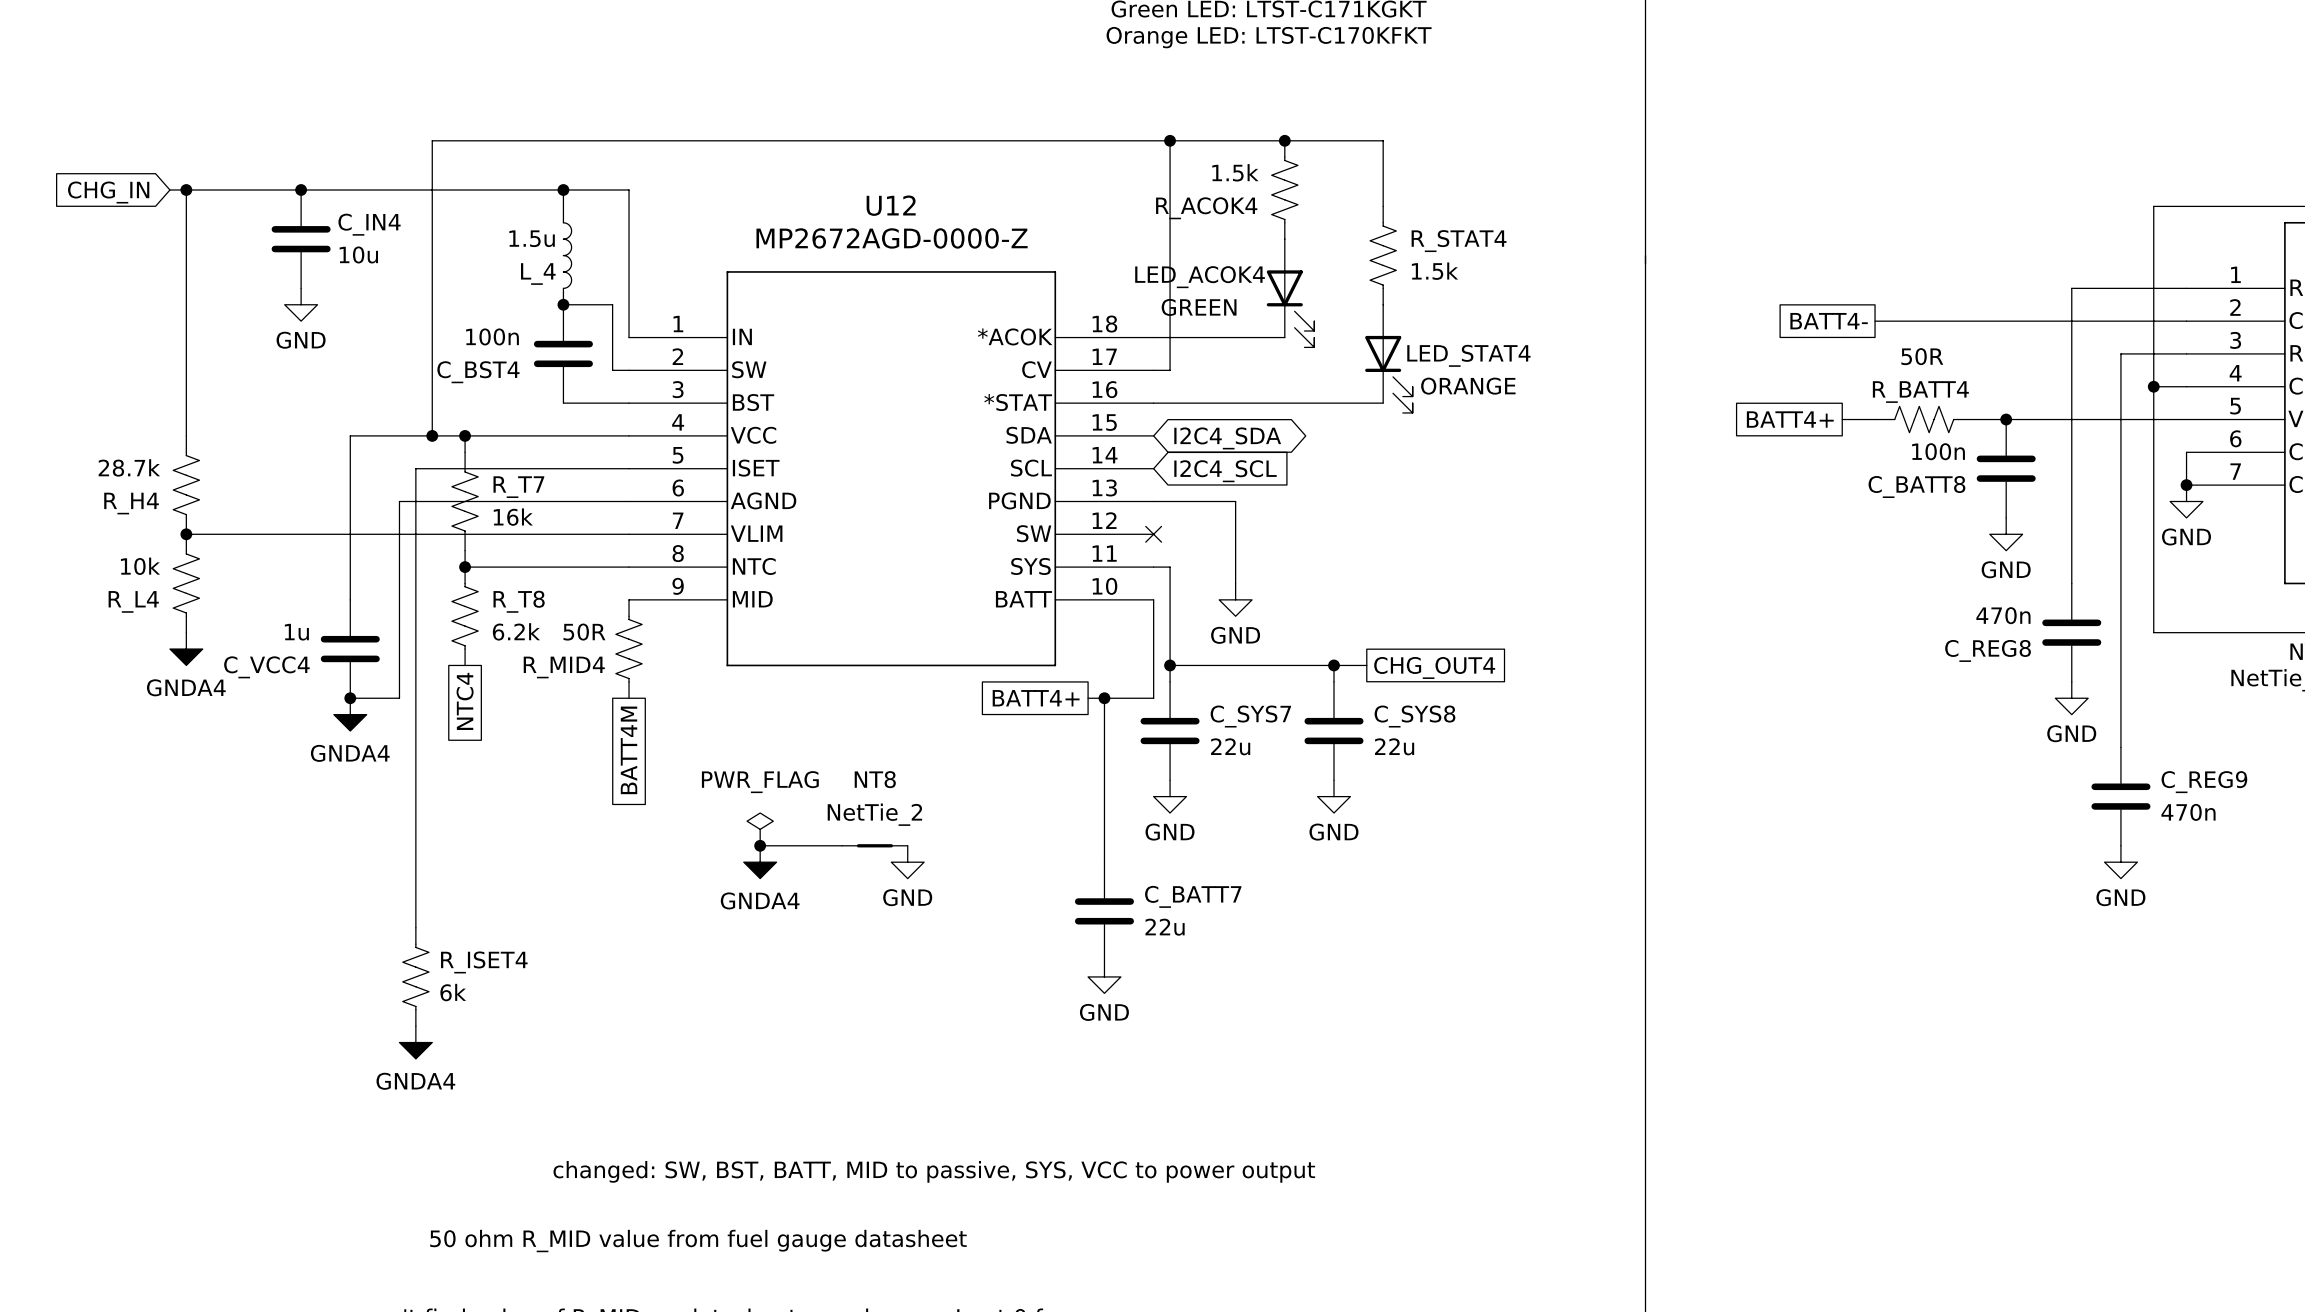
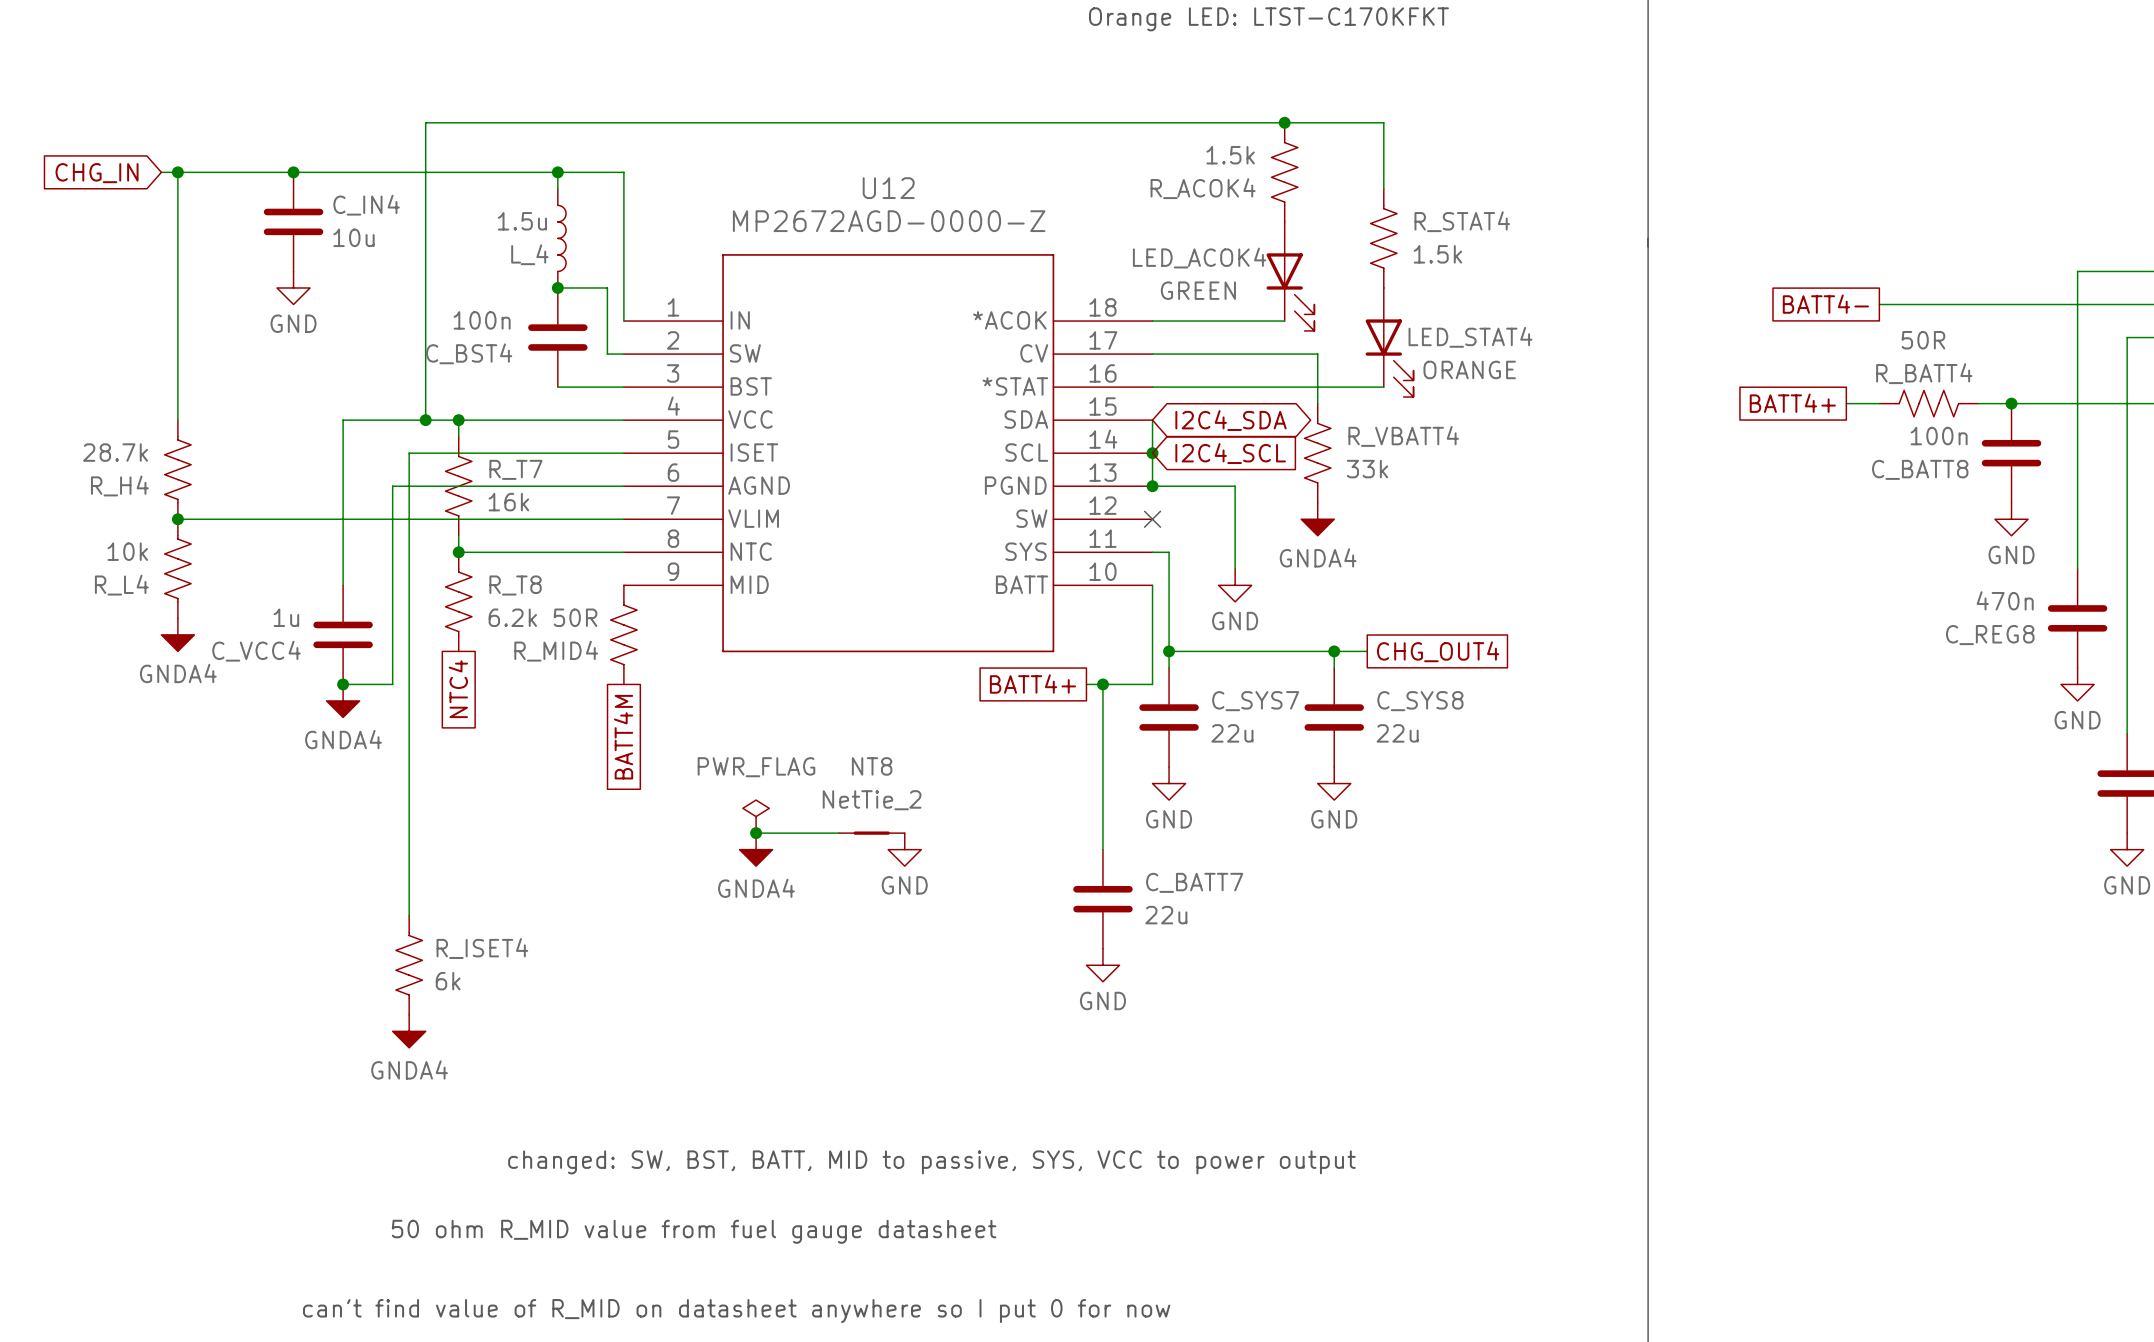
wire: (1170, 140) (1170, 370) -> (1317, 403) (1317, 354) (1169, 354)
junction: (1170, 140) -> none
wire: none -> (1152, 420) (1152, 486)
junction: none -> (1152, 453)
R_VBATT4: none -> 33k (1317, 453)
junction: none -> (1152, 486)
power symbol: none -> GNDA4 (1317, 519)

